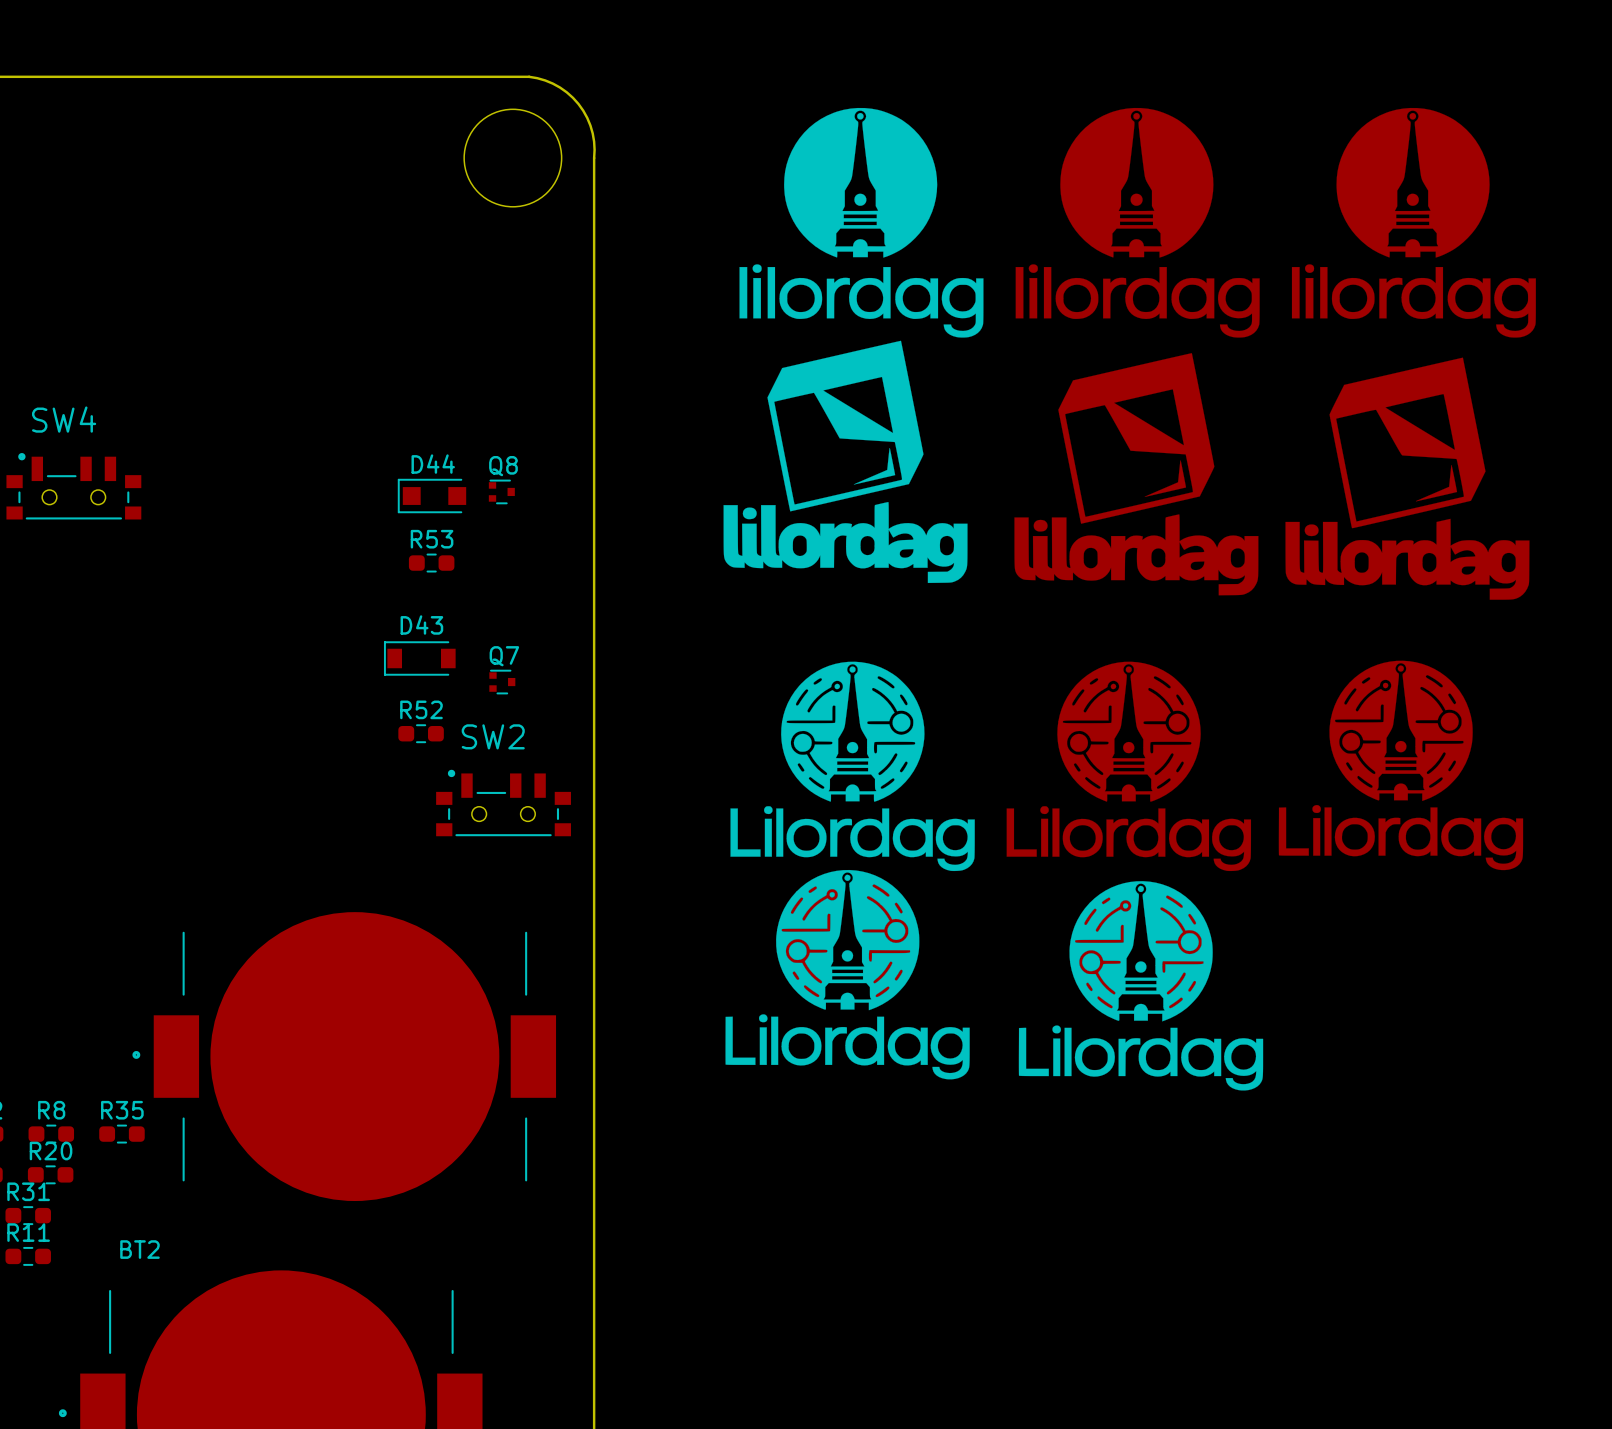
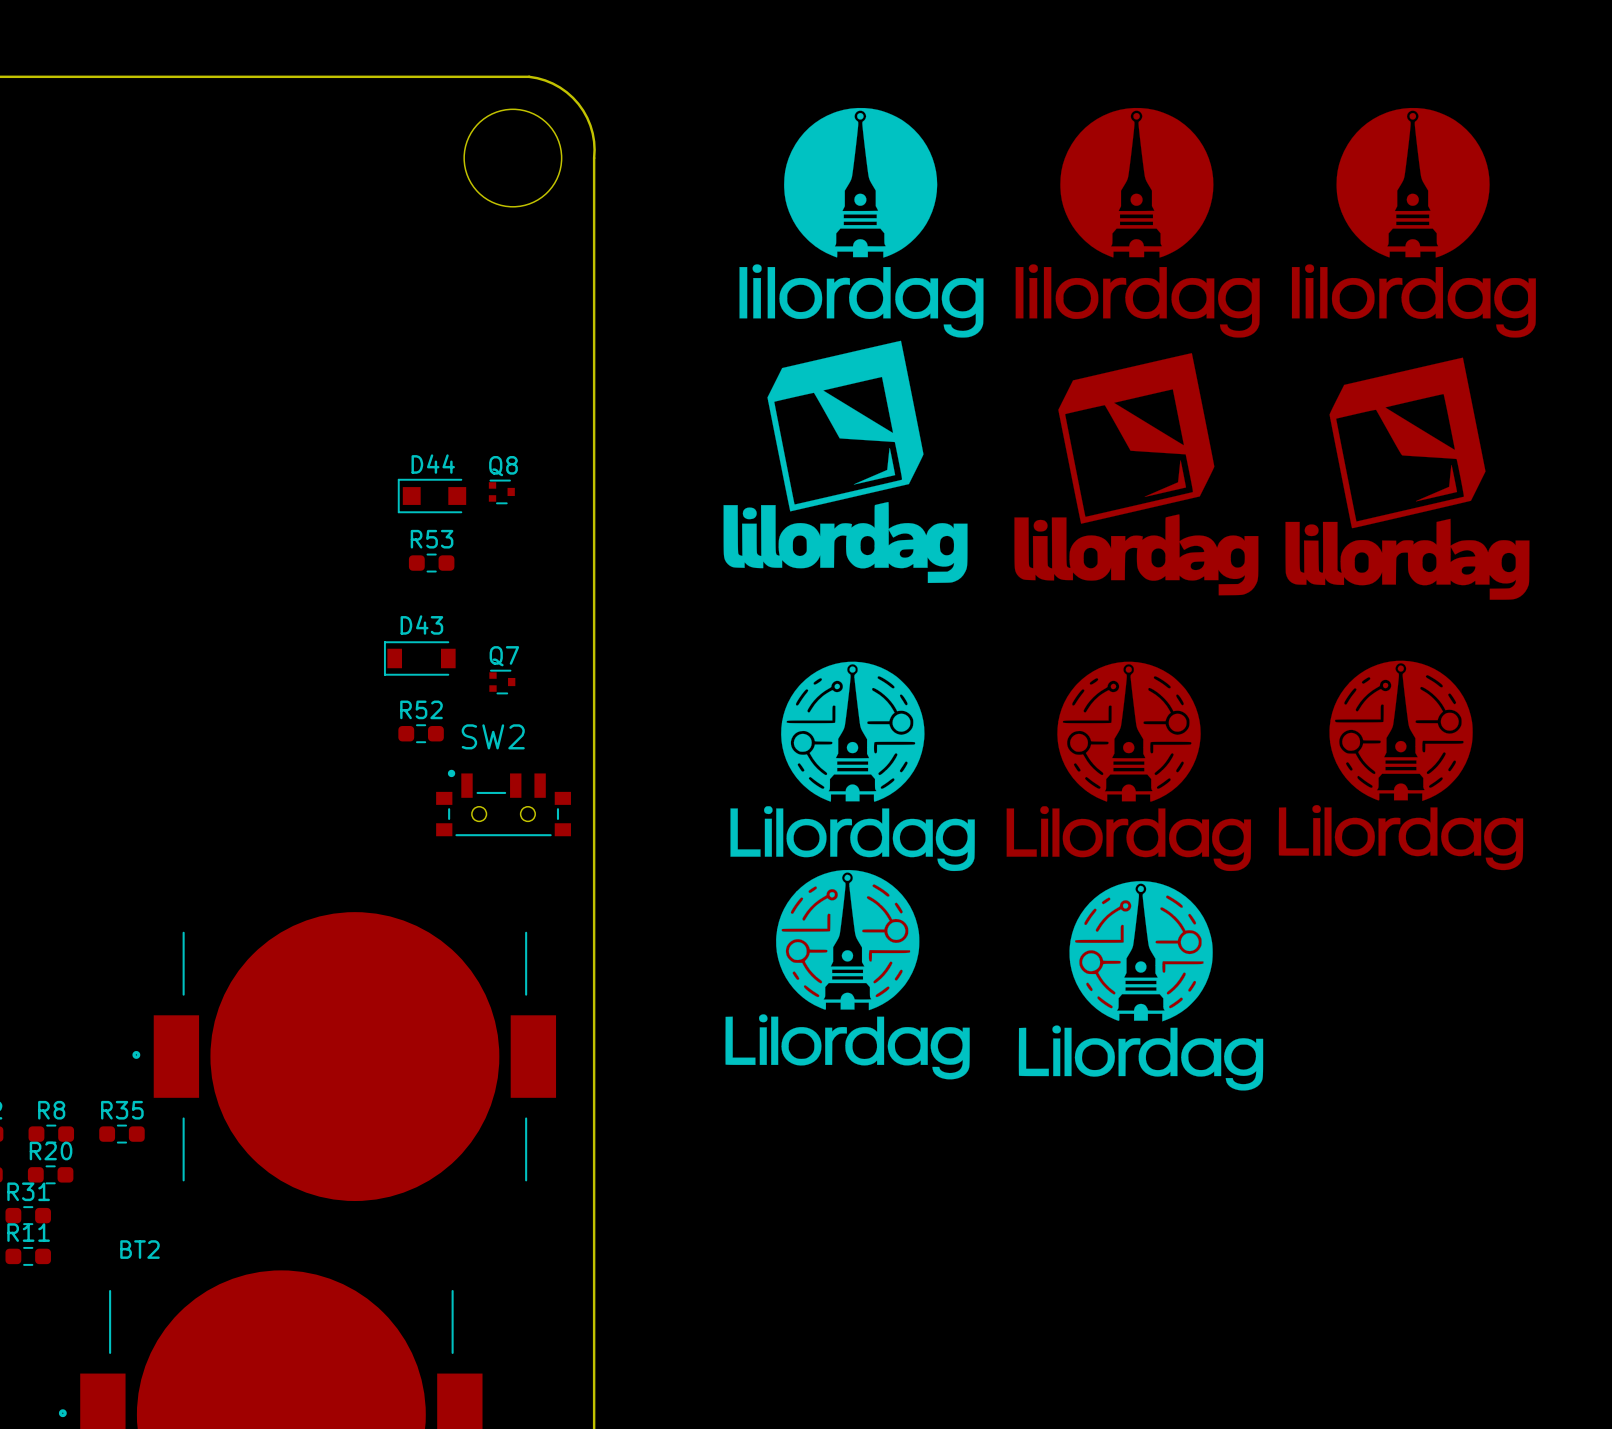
SW4: (73, 486) -> none

